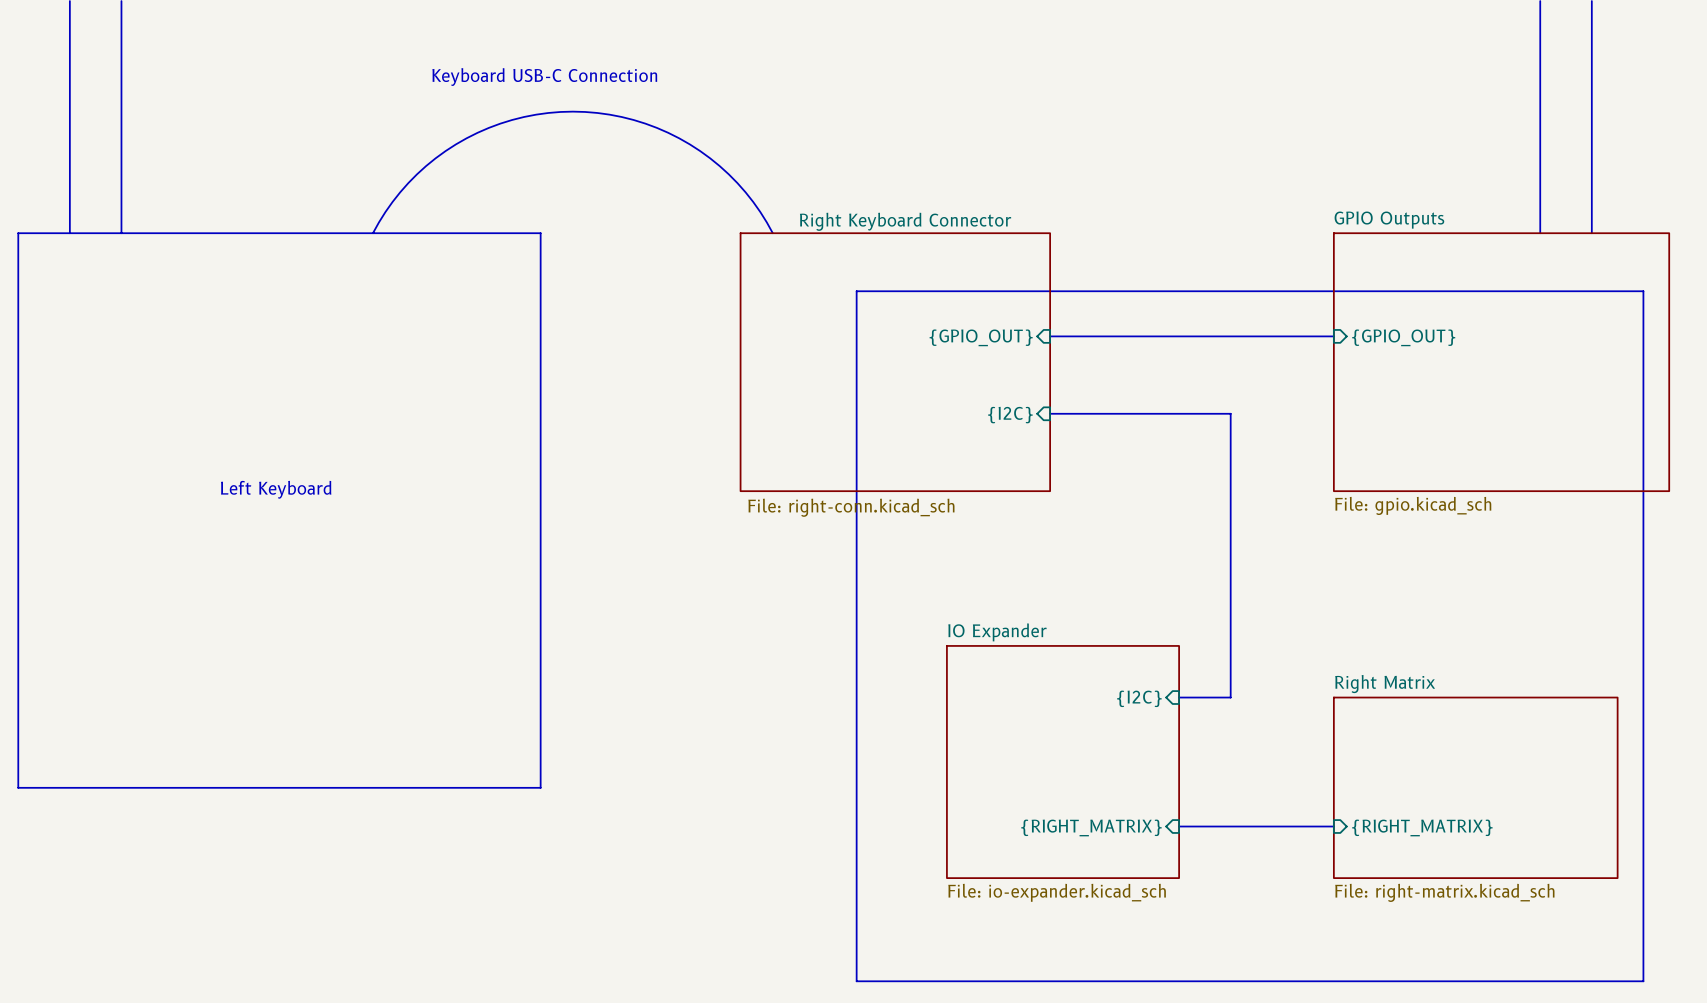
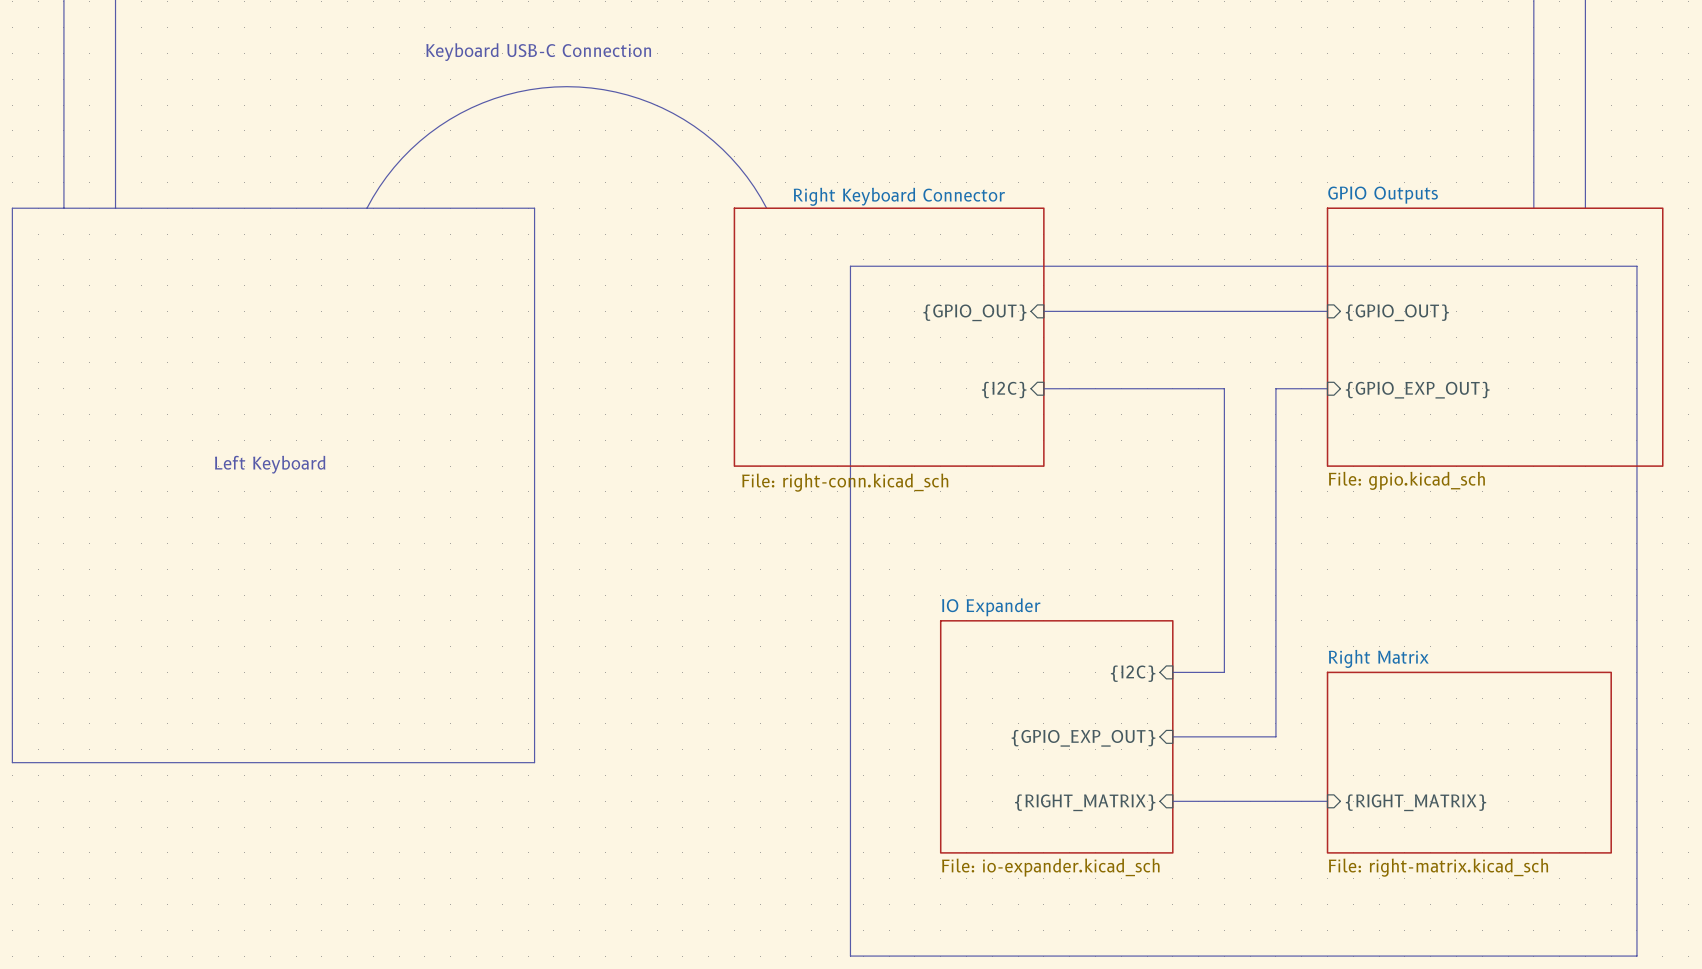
bus: none -> (1327, 388) (1275, 388) (1275, 736) (1172, 736)
sheet pin: none -> {GPIO_EXP_OUT} (1417, 390)
sheet pin: none -> {GPIO_EXP_OUT} (1083, 738)

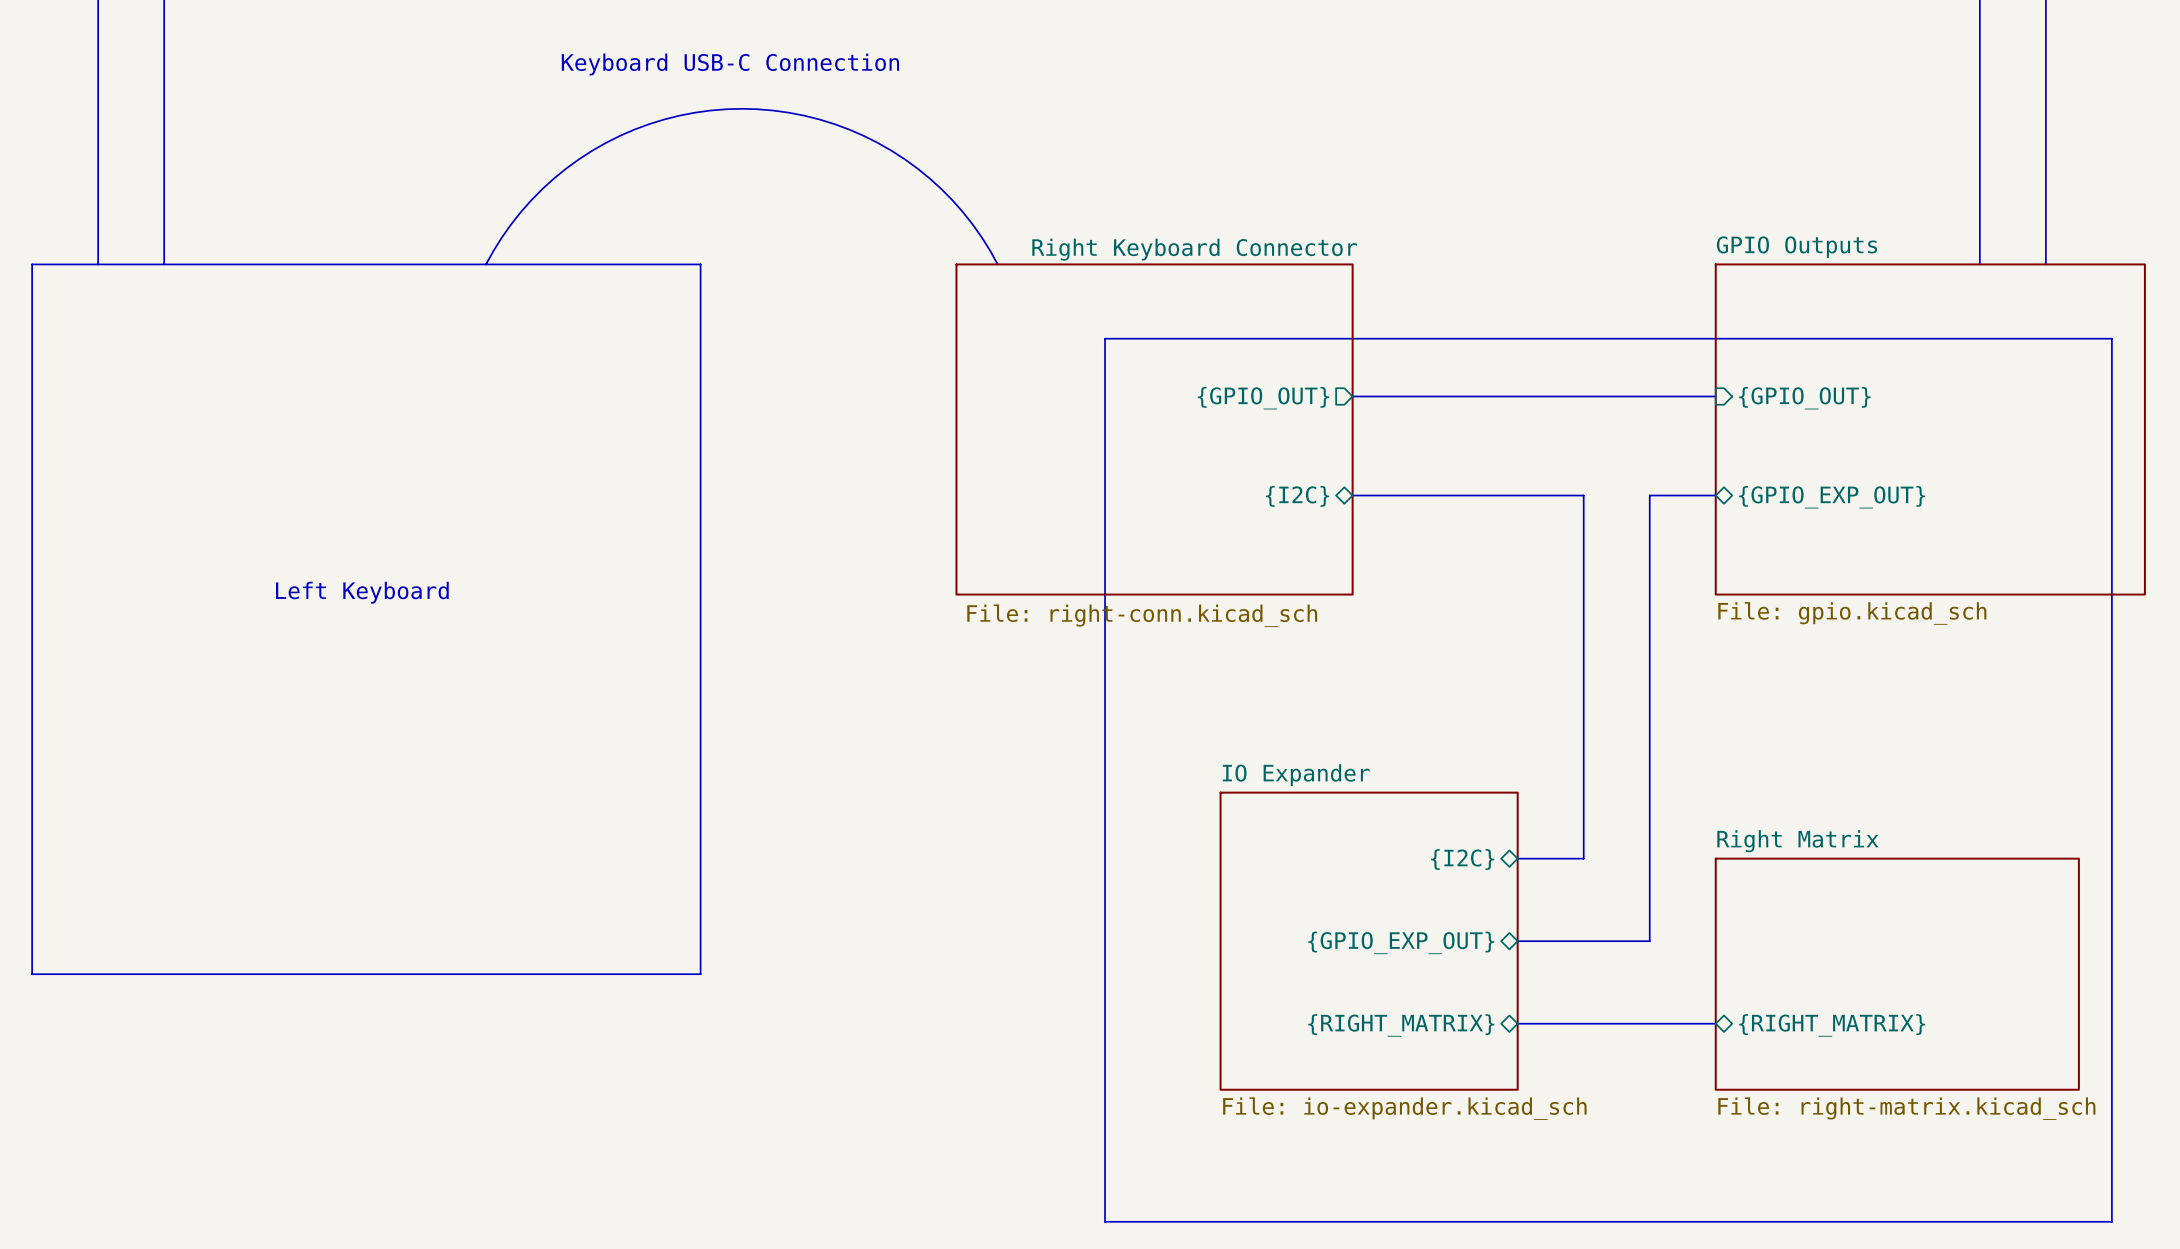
sheet pin shape: input (974, 312) -> output (1263, 398)
sheet pin shape: input (1004, 390) -> bidirectional (1297, 496)
sheet pin shape: input (1417, 390) -> bidirectional (1832, 497)
sheet pin shape: input (1133, 673) -> bidirectional (1462, 859)
sheet pin shape: input (1083, 738) -> bidirectional (1401, 942)
sheet pin shape: input (1085, 802) -> bidirectional (1401, 1025)
sheet pin shape: input (1416, 802) -> bidirectional (1832, 1025)

